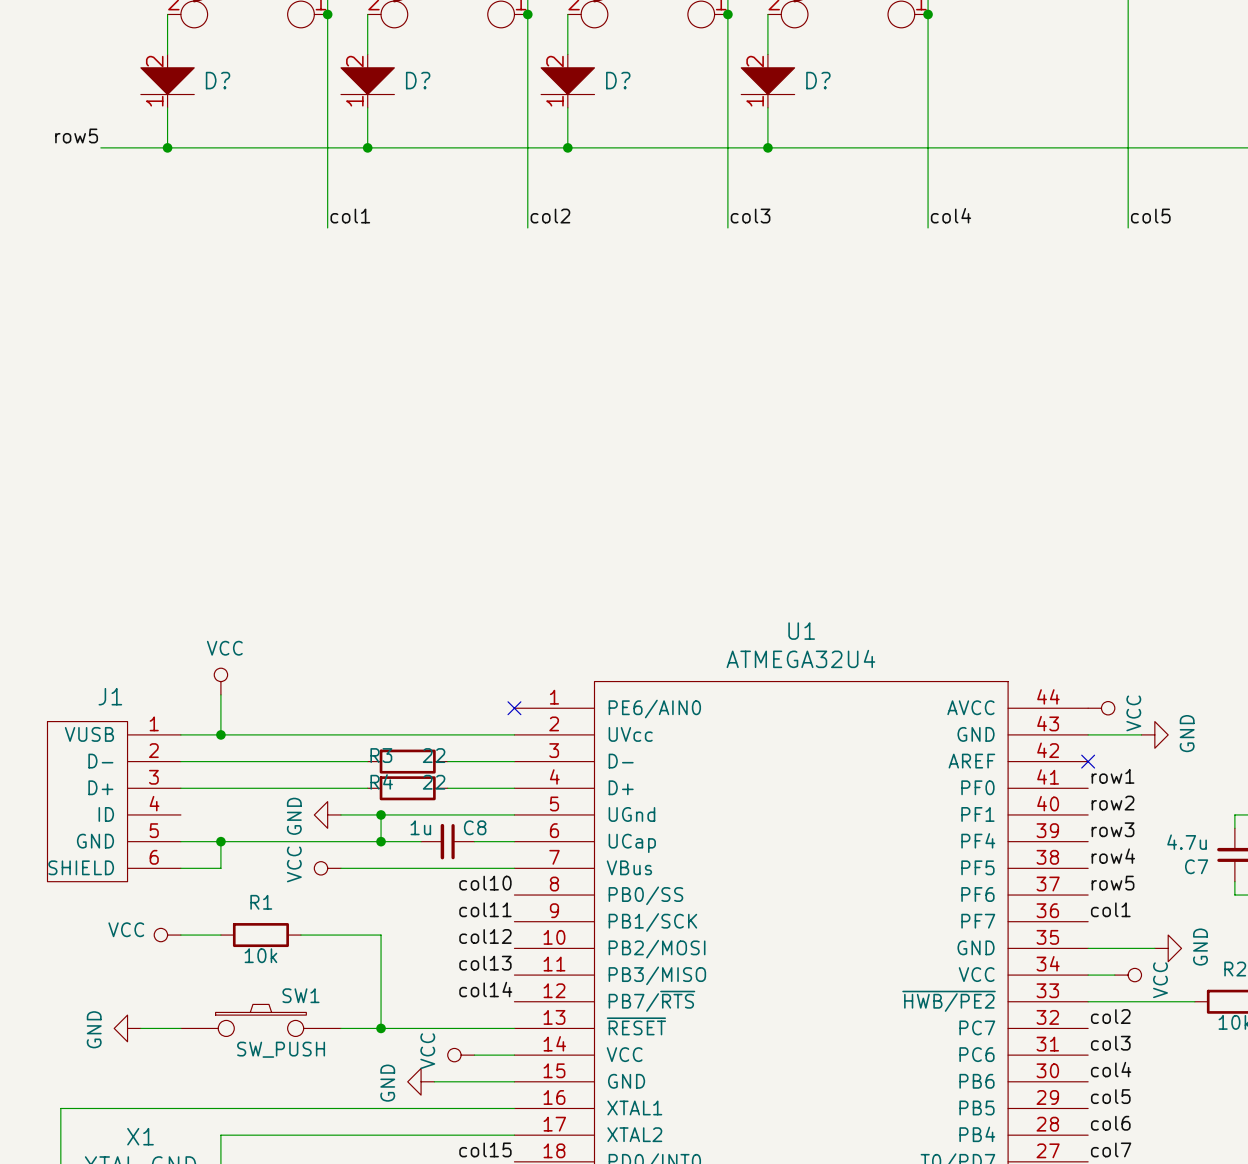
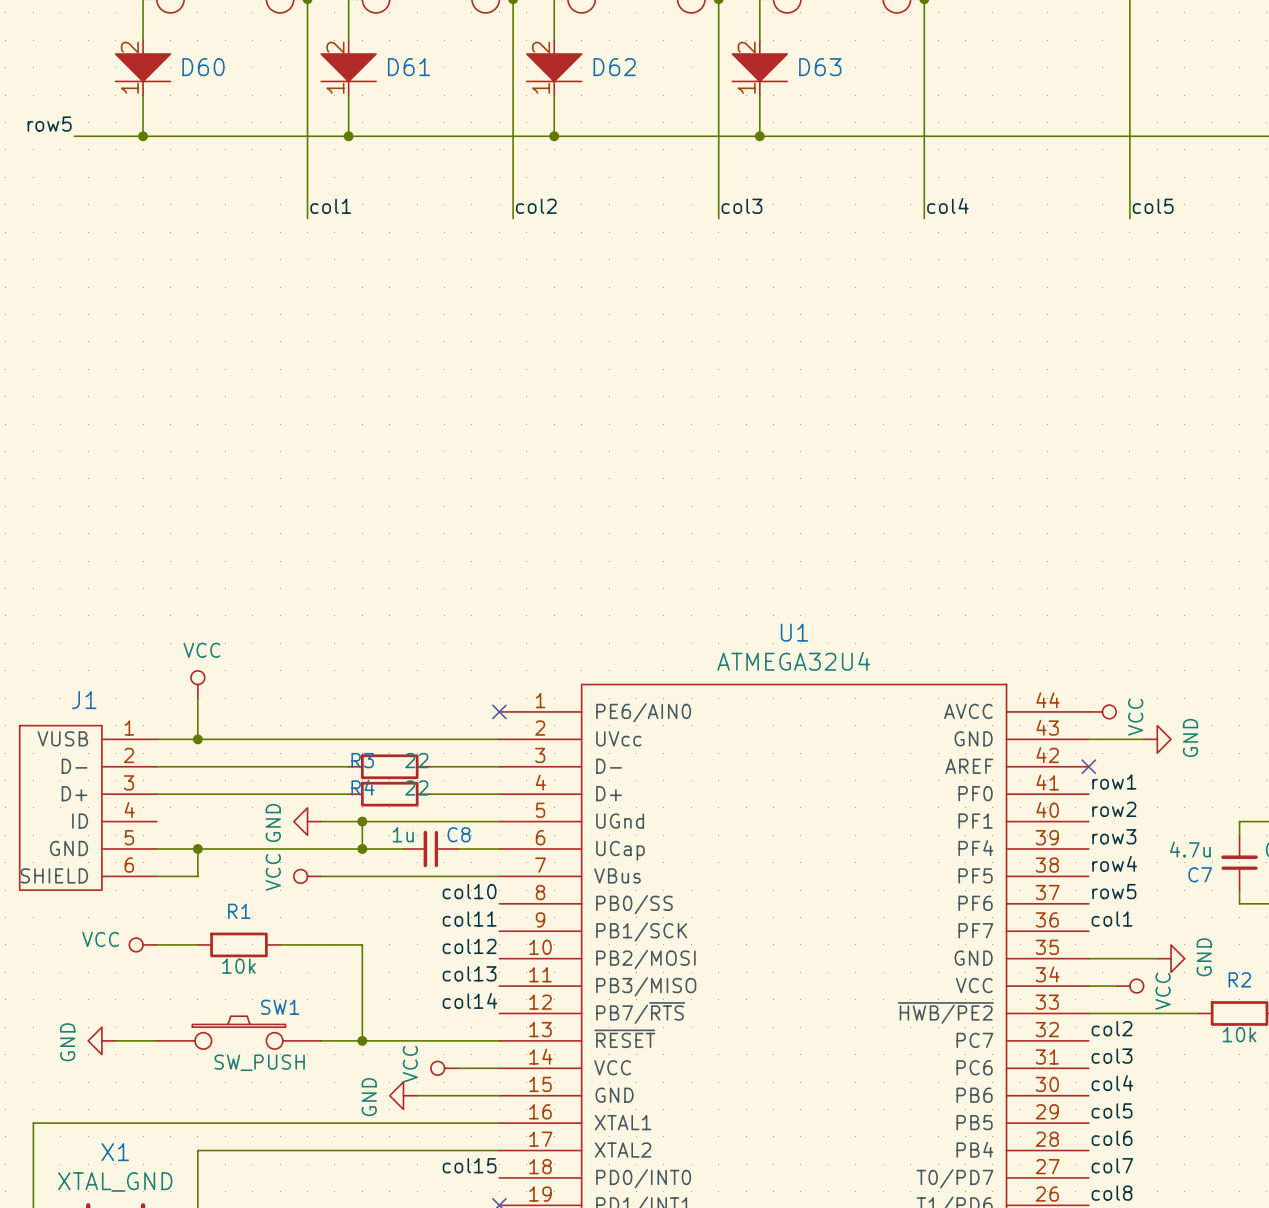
D? name: D? (218, 80) -> D60 (203, 67)
D? name: D? (418, 80) -> D61 (409, 67)
D? name: D? (618, 80) -> D62 (614, 67)
D? name: D? (818, 80) -> D63 (820, 67)

